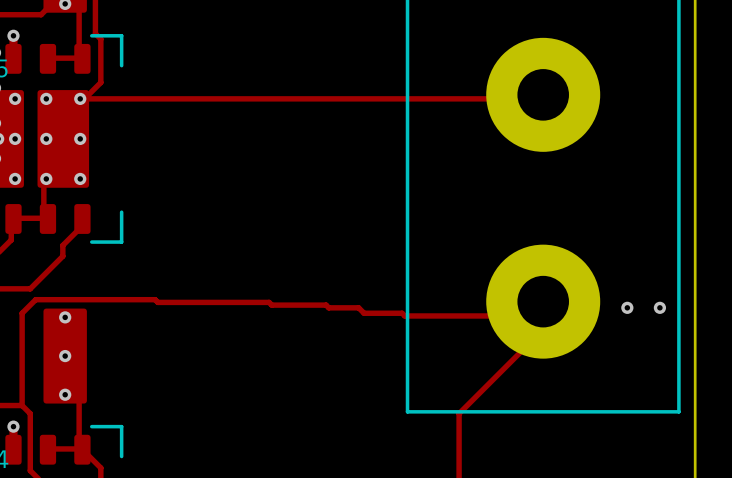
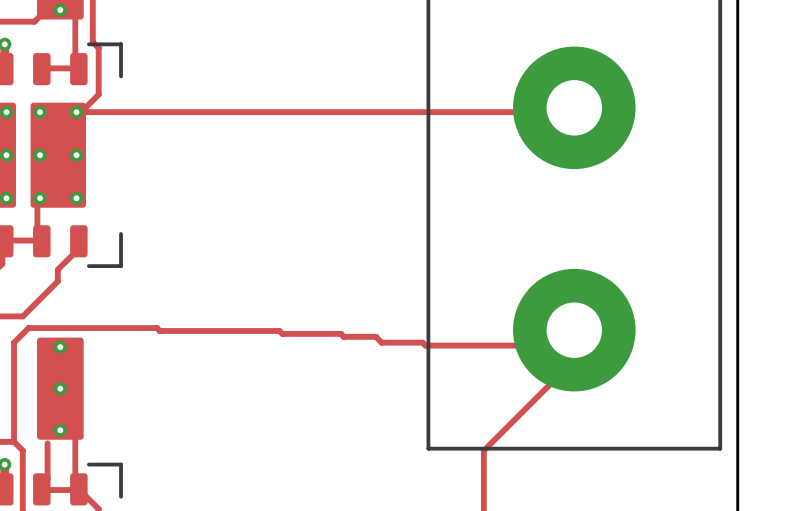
via: (627, 307) -> none
via: (659, 307) -> none
top track: (47, 449) (82, 449) -> (47, 443) (47, 478) (41, 489) (78, 489)

